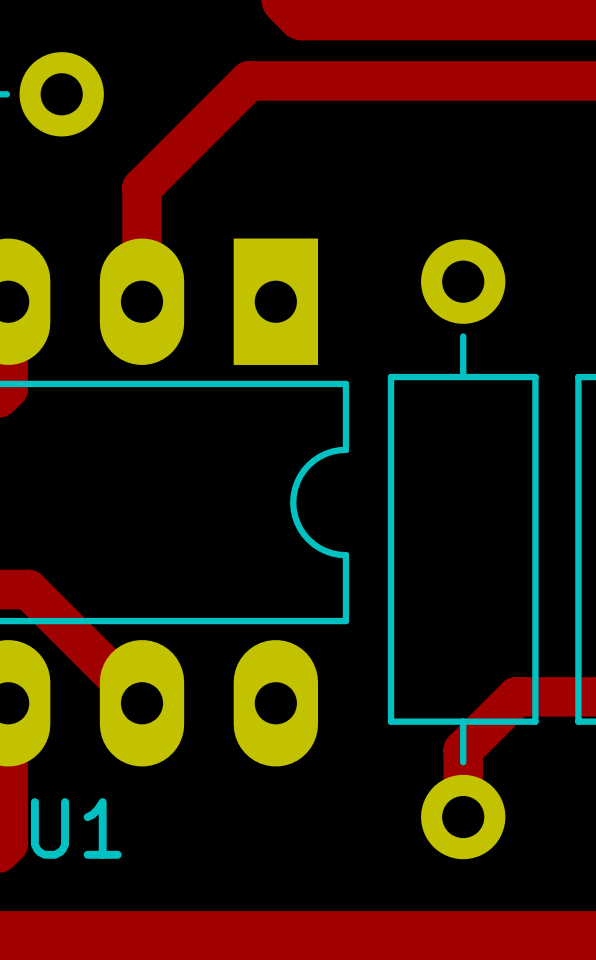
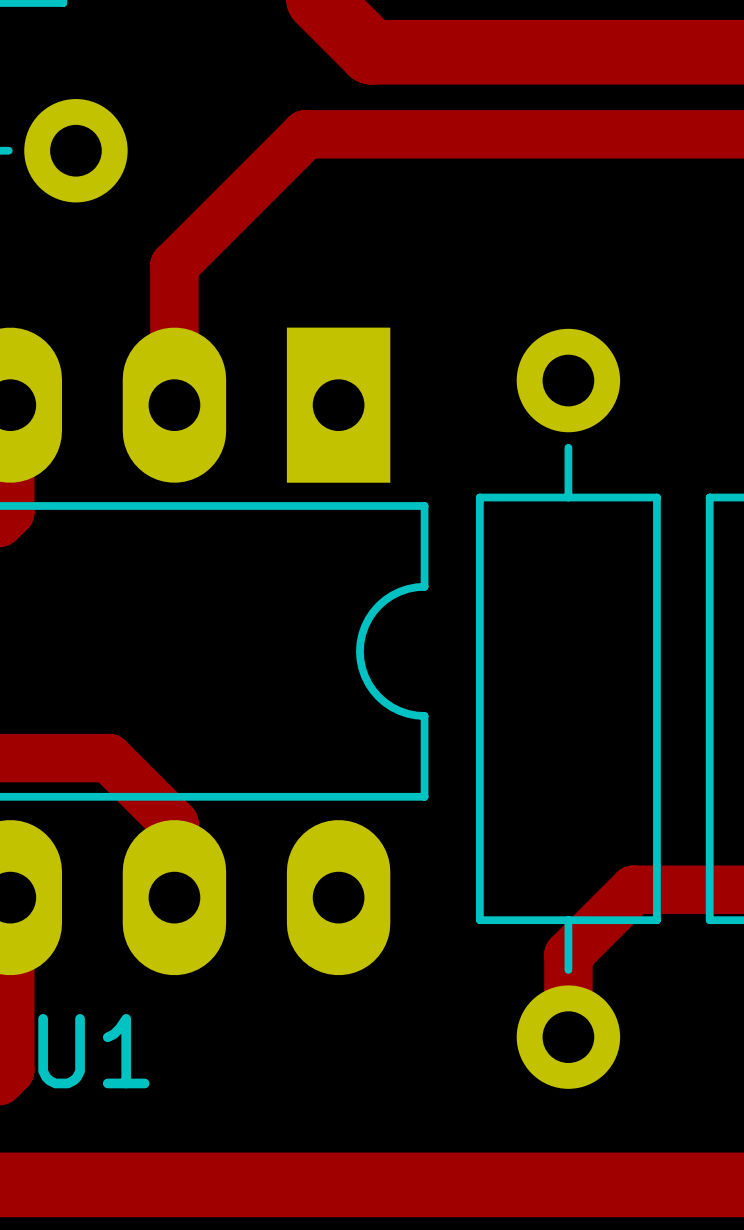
track: (28, 589) (142, 703) -> (34, 758) (108, 758) (174, 823) (174, 897)

